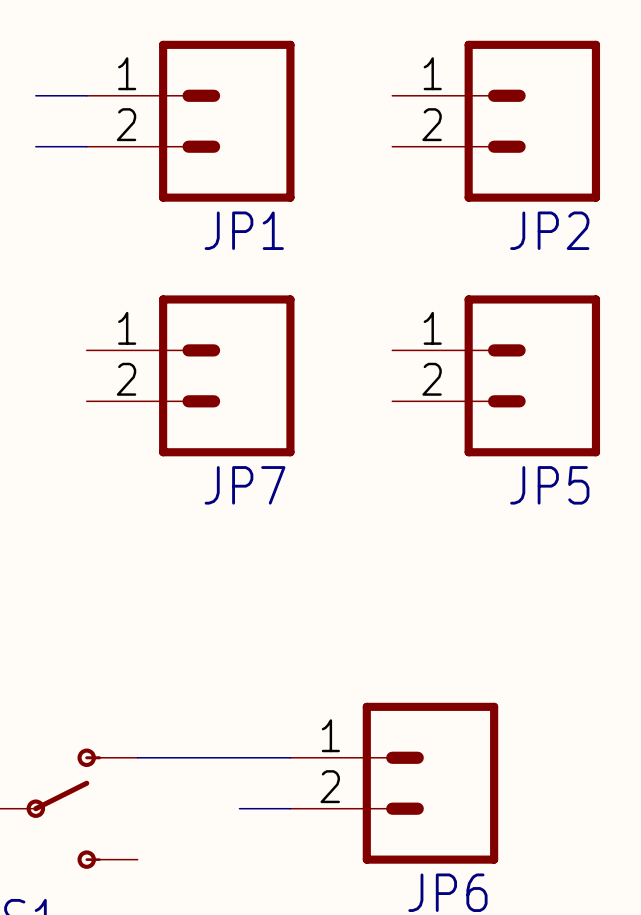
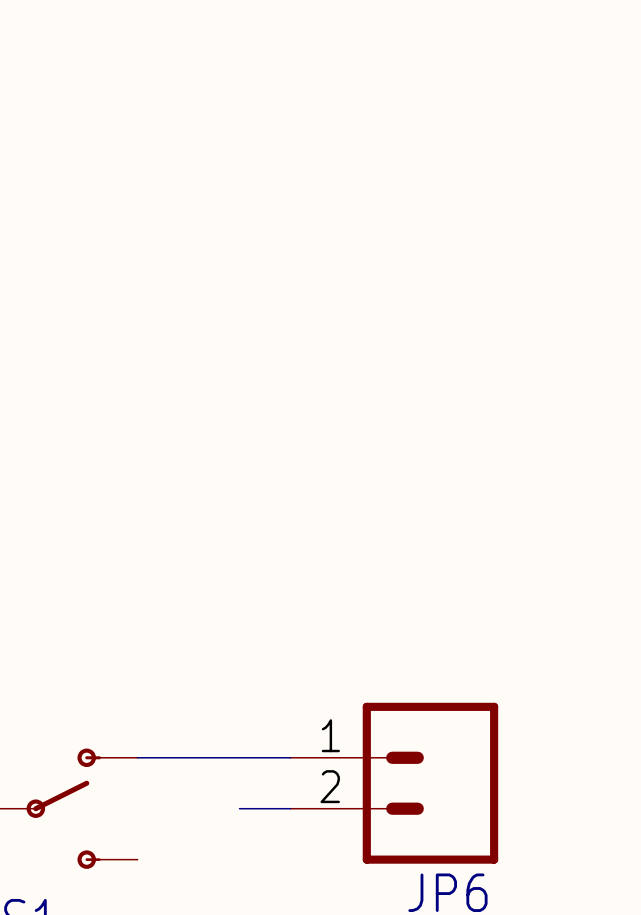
wire: (35, 95) (86, 95) -> none
JP1: (190, 121) -> none
JP2: (496, 121) -> none
wire: (35, 146) (86, 146) -> none
JP7: (190, 375) -> none
JP5: (496, 375) -> none

